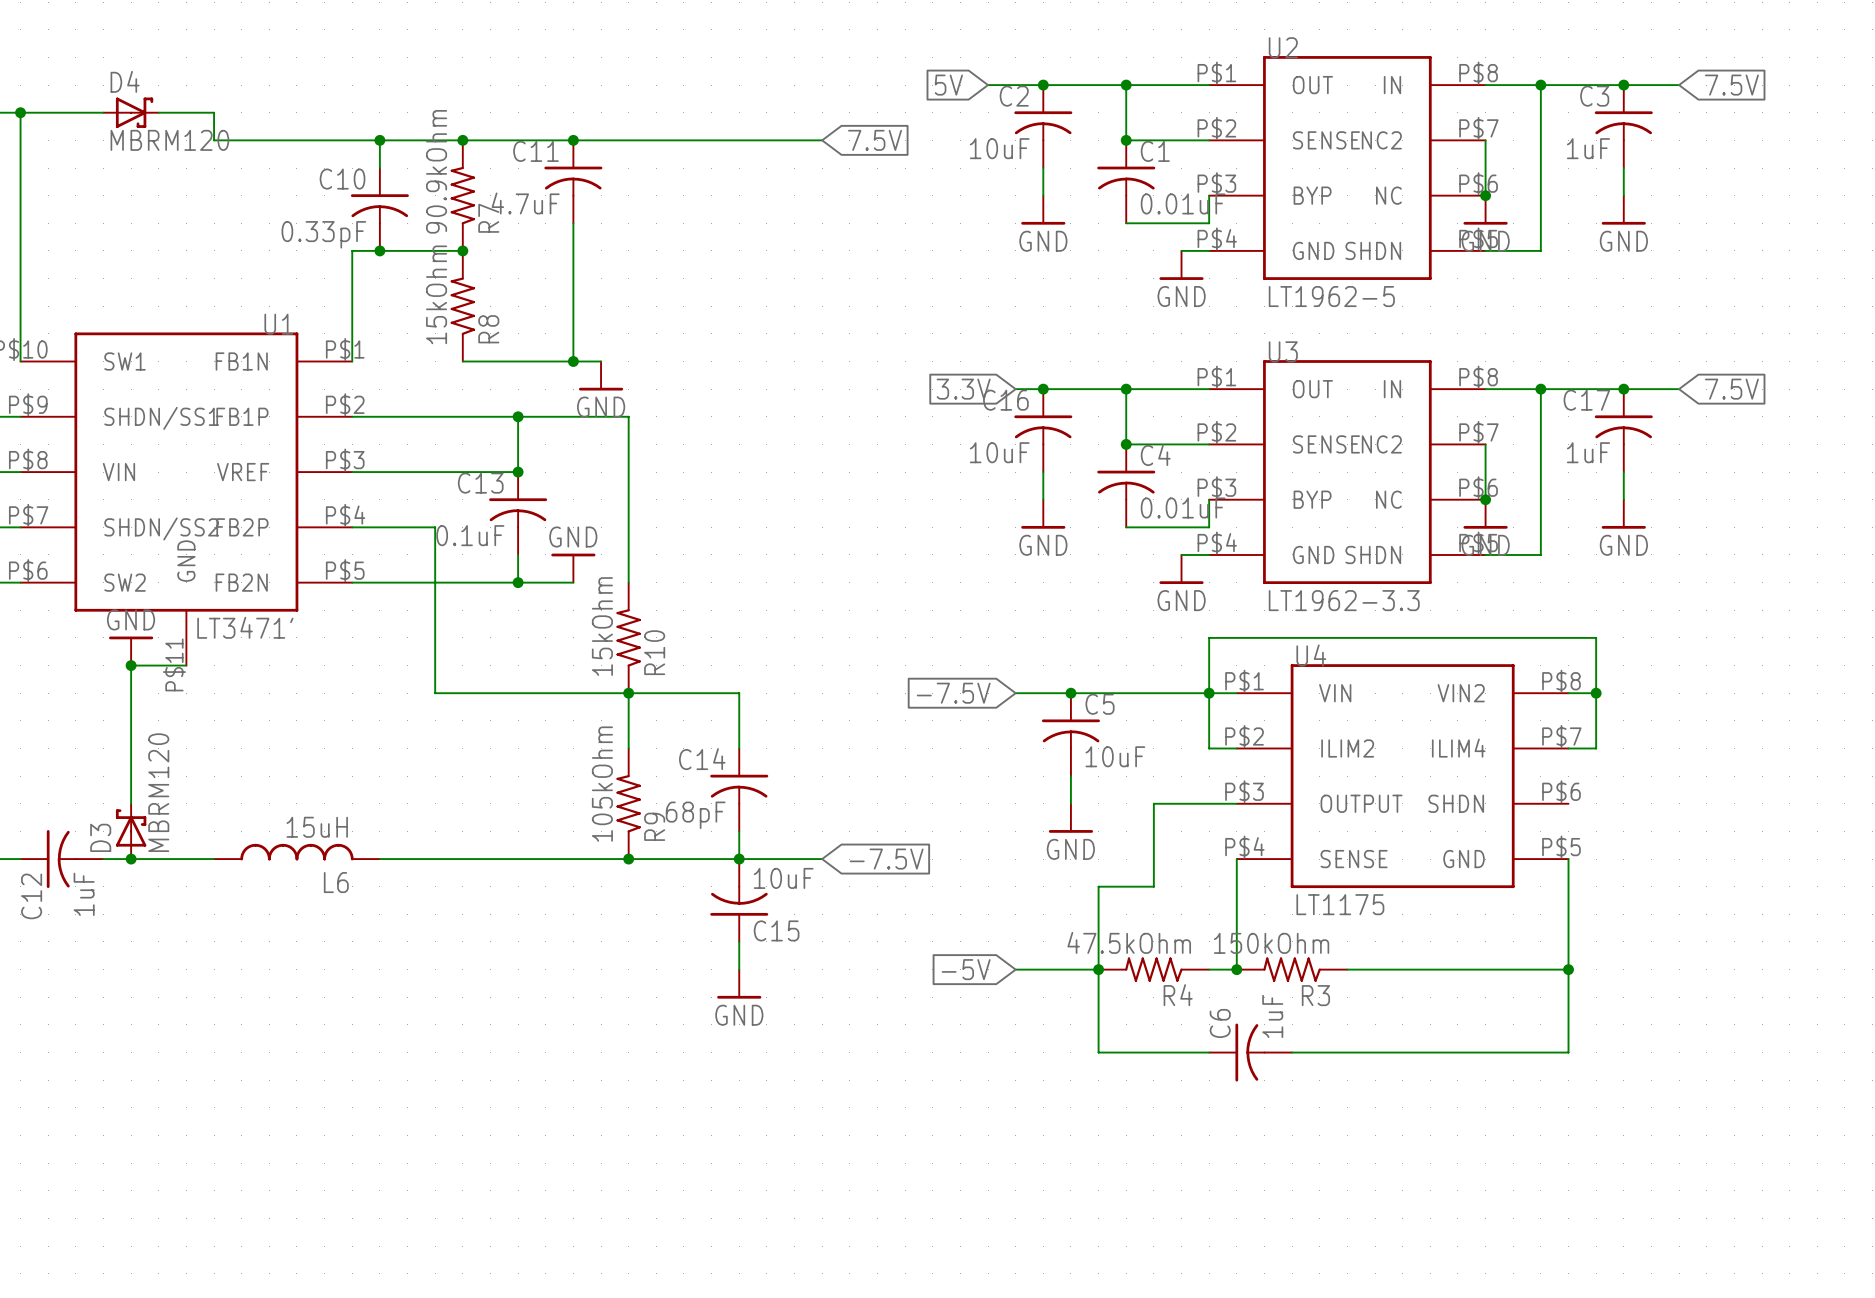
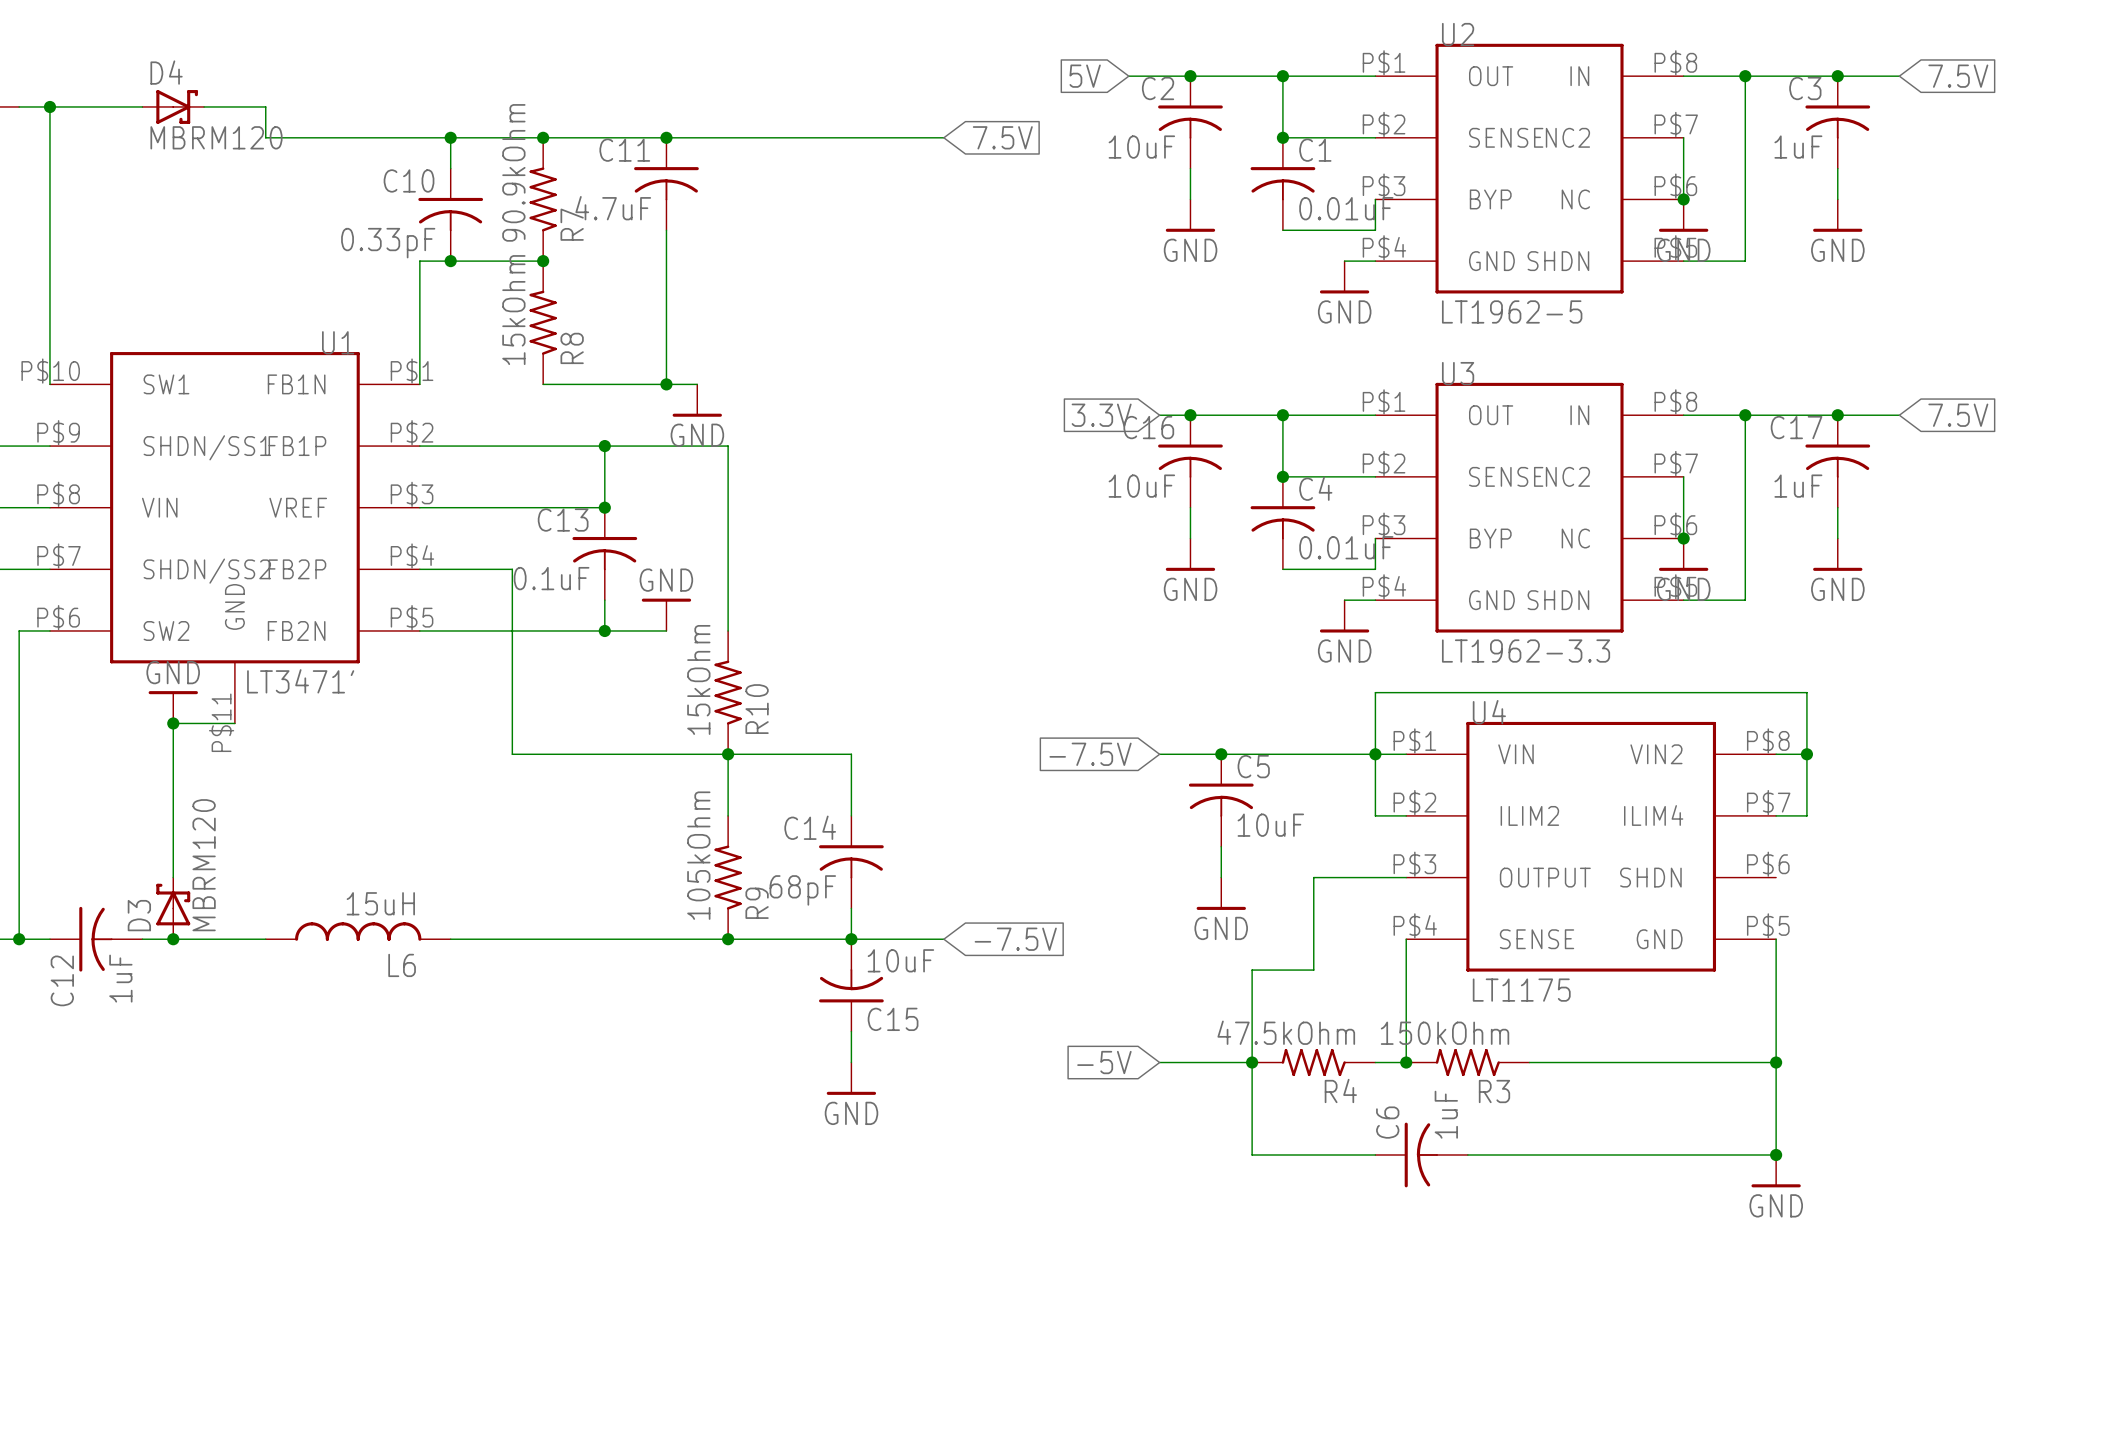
junction: none -> (1776, 1154)
power symbol: none -> GND (1776, 1171)

